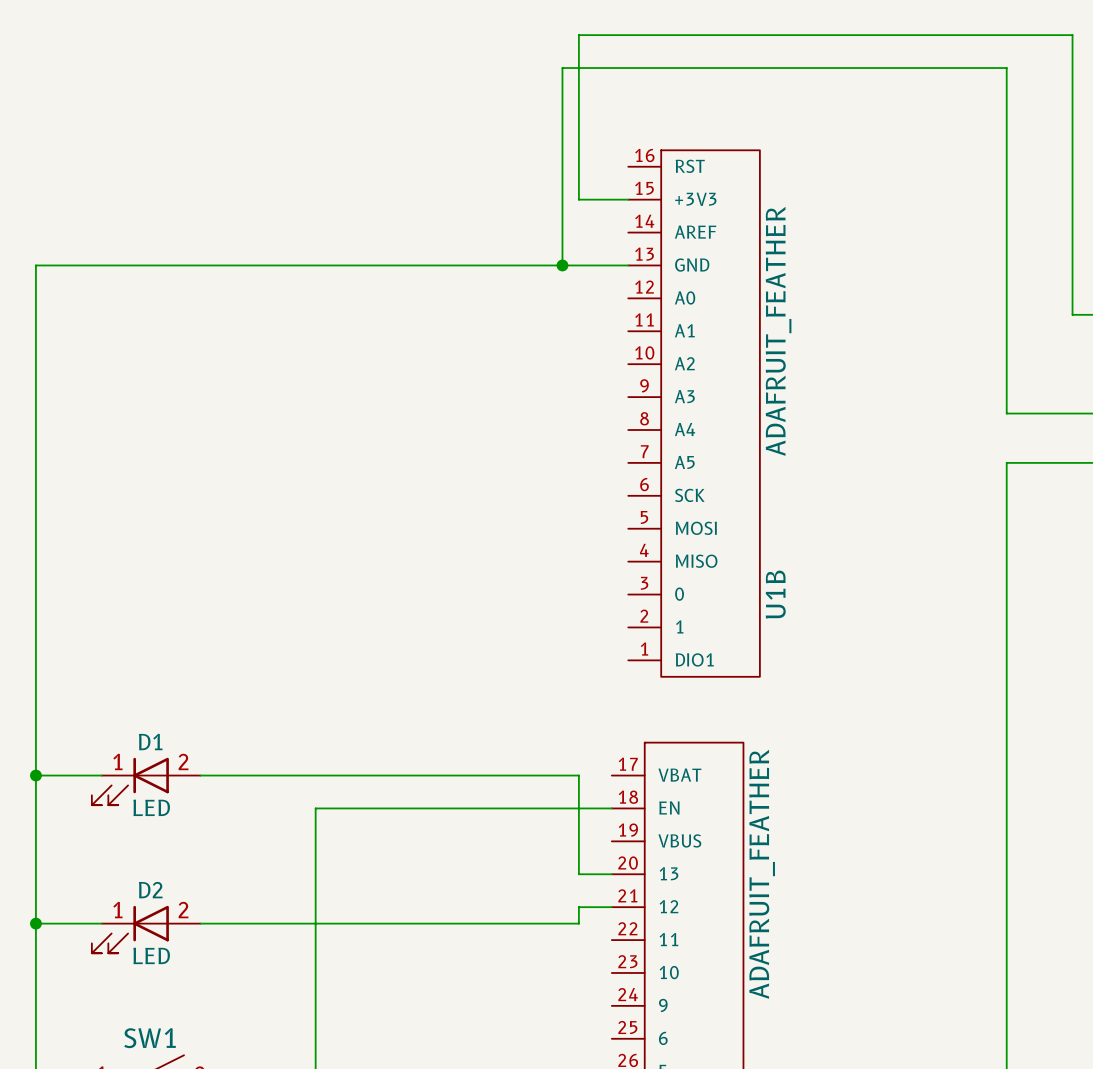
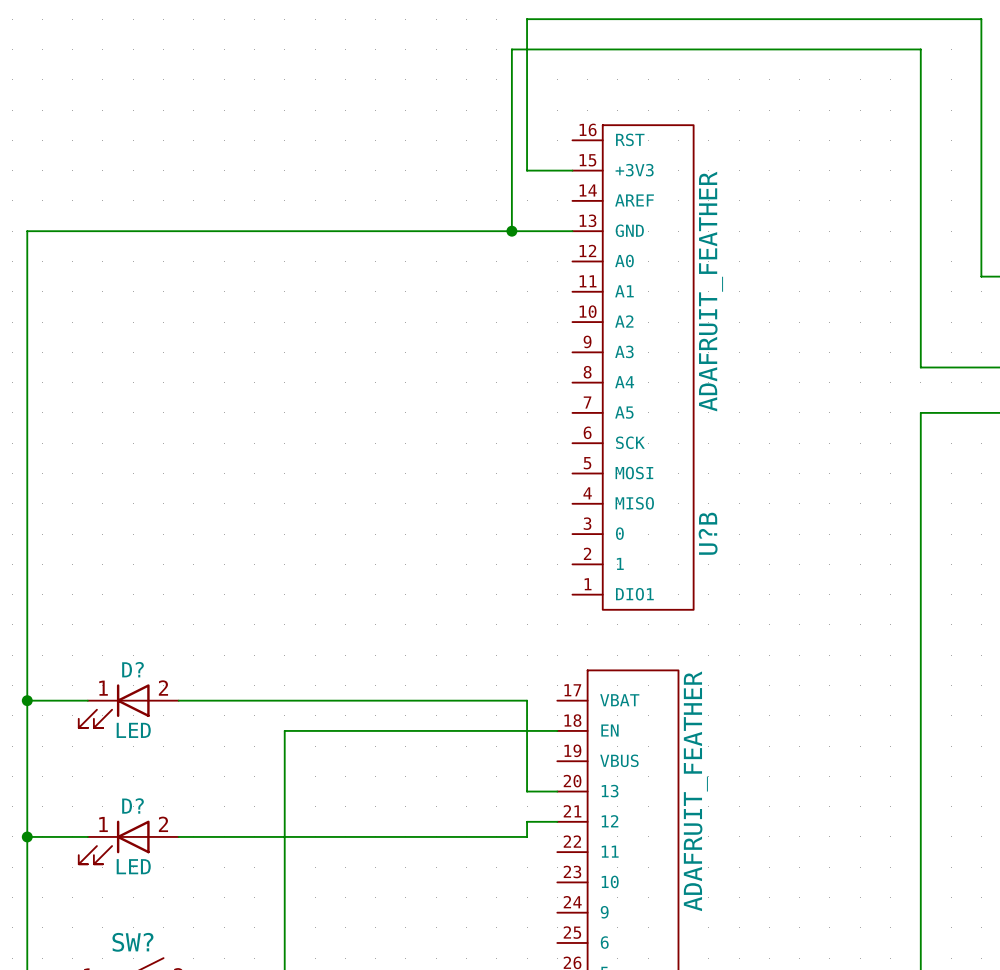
U1B name: U1B (775, 594) -> U?B (708, 533)
D1 name: D1 (150, 742) -> D? (132, 669)
D2 name: D2 (150, 890) -> D? (132, 805)
SW1 name: SW1 (150, 1038) -> SW? (132, 942)

